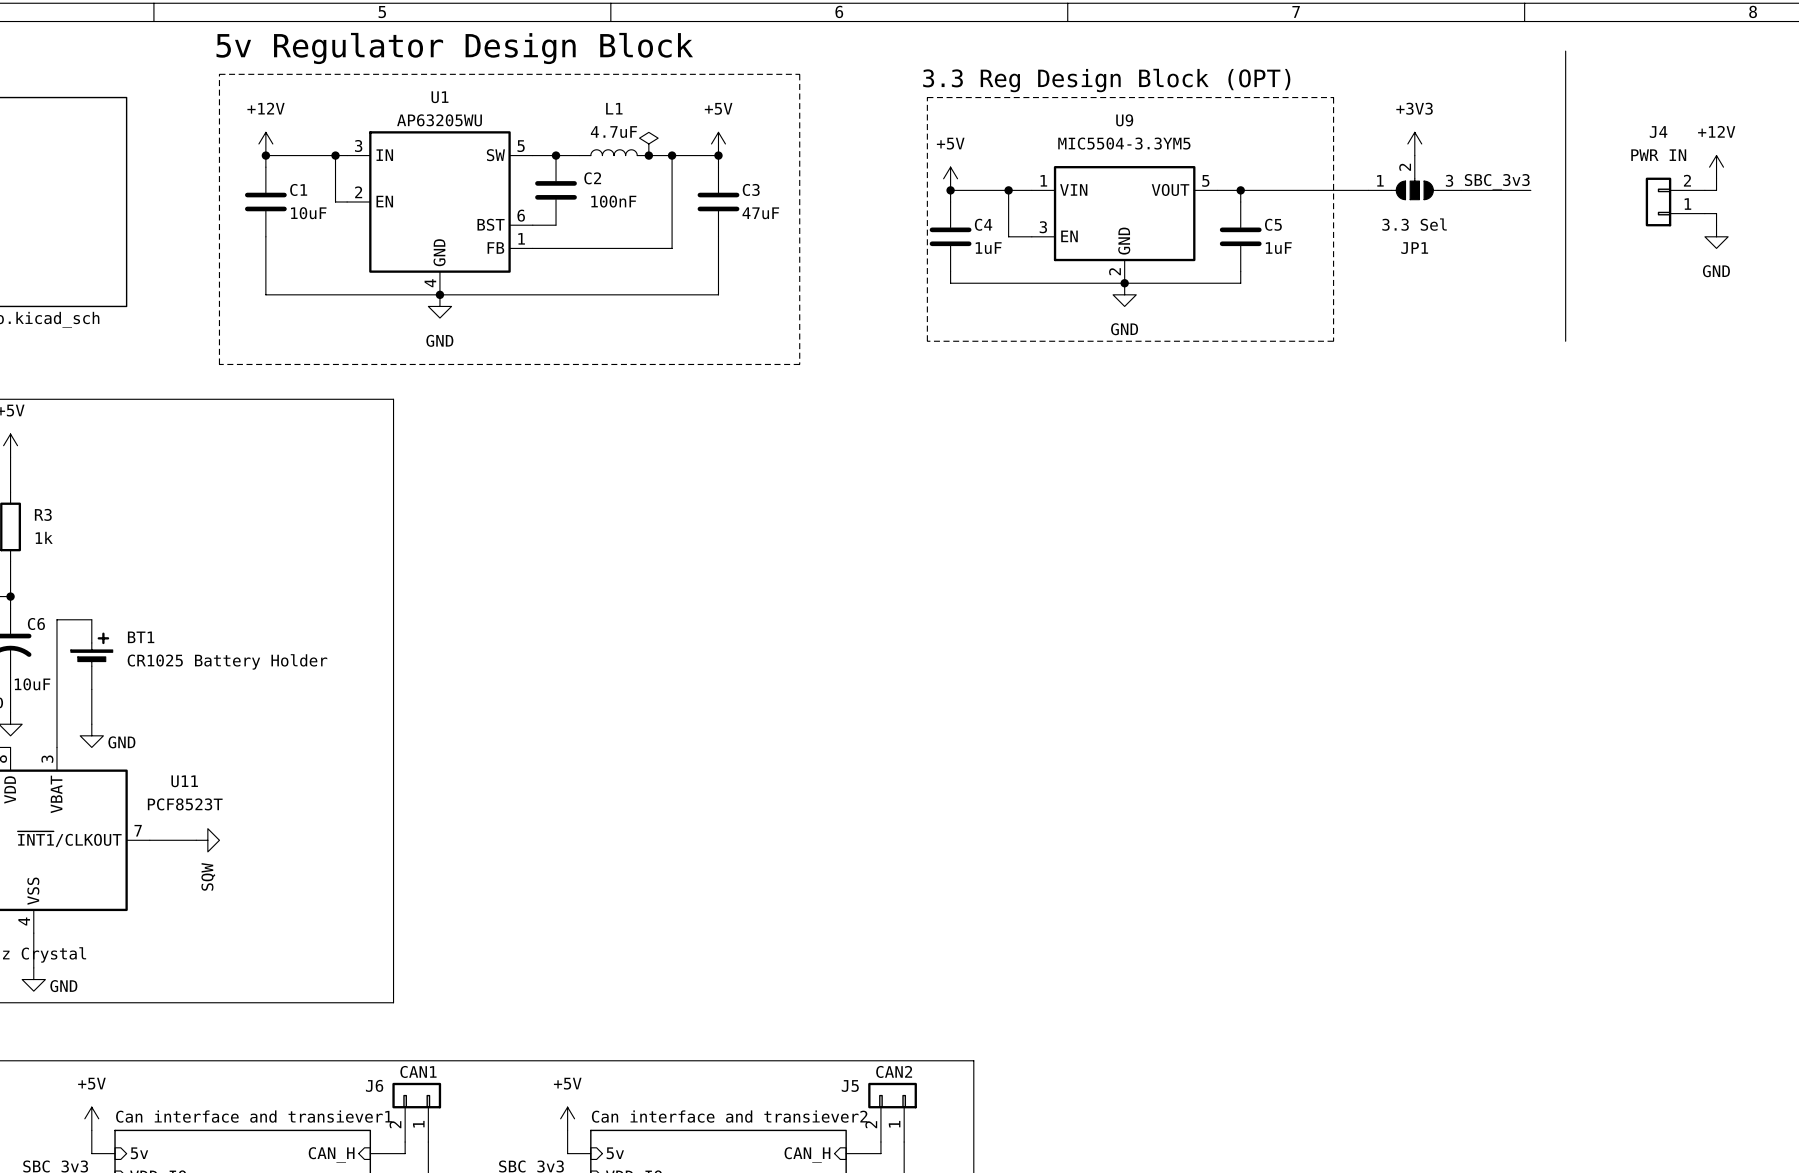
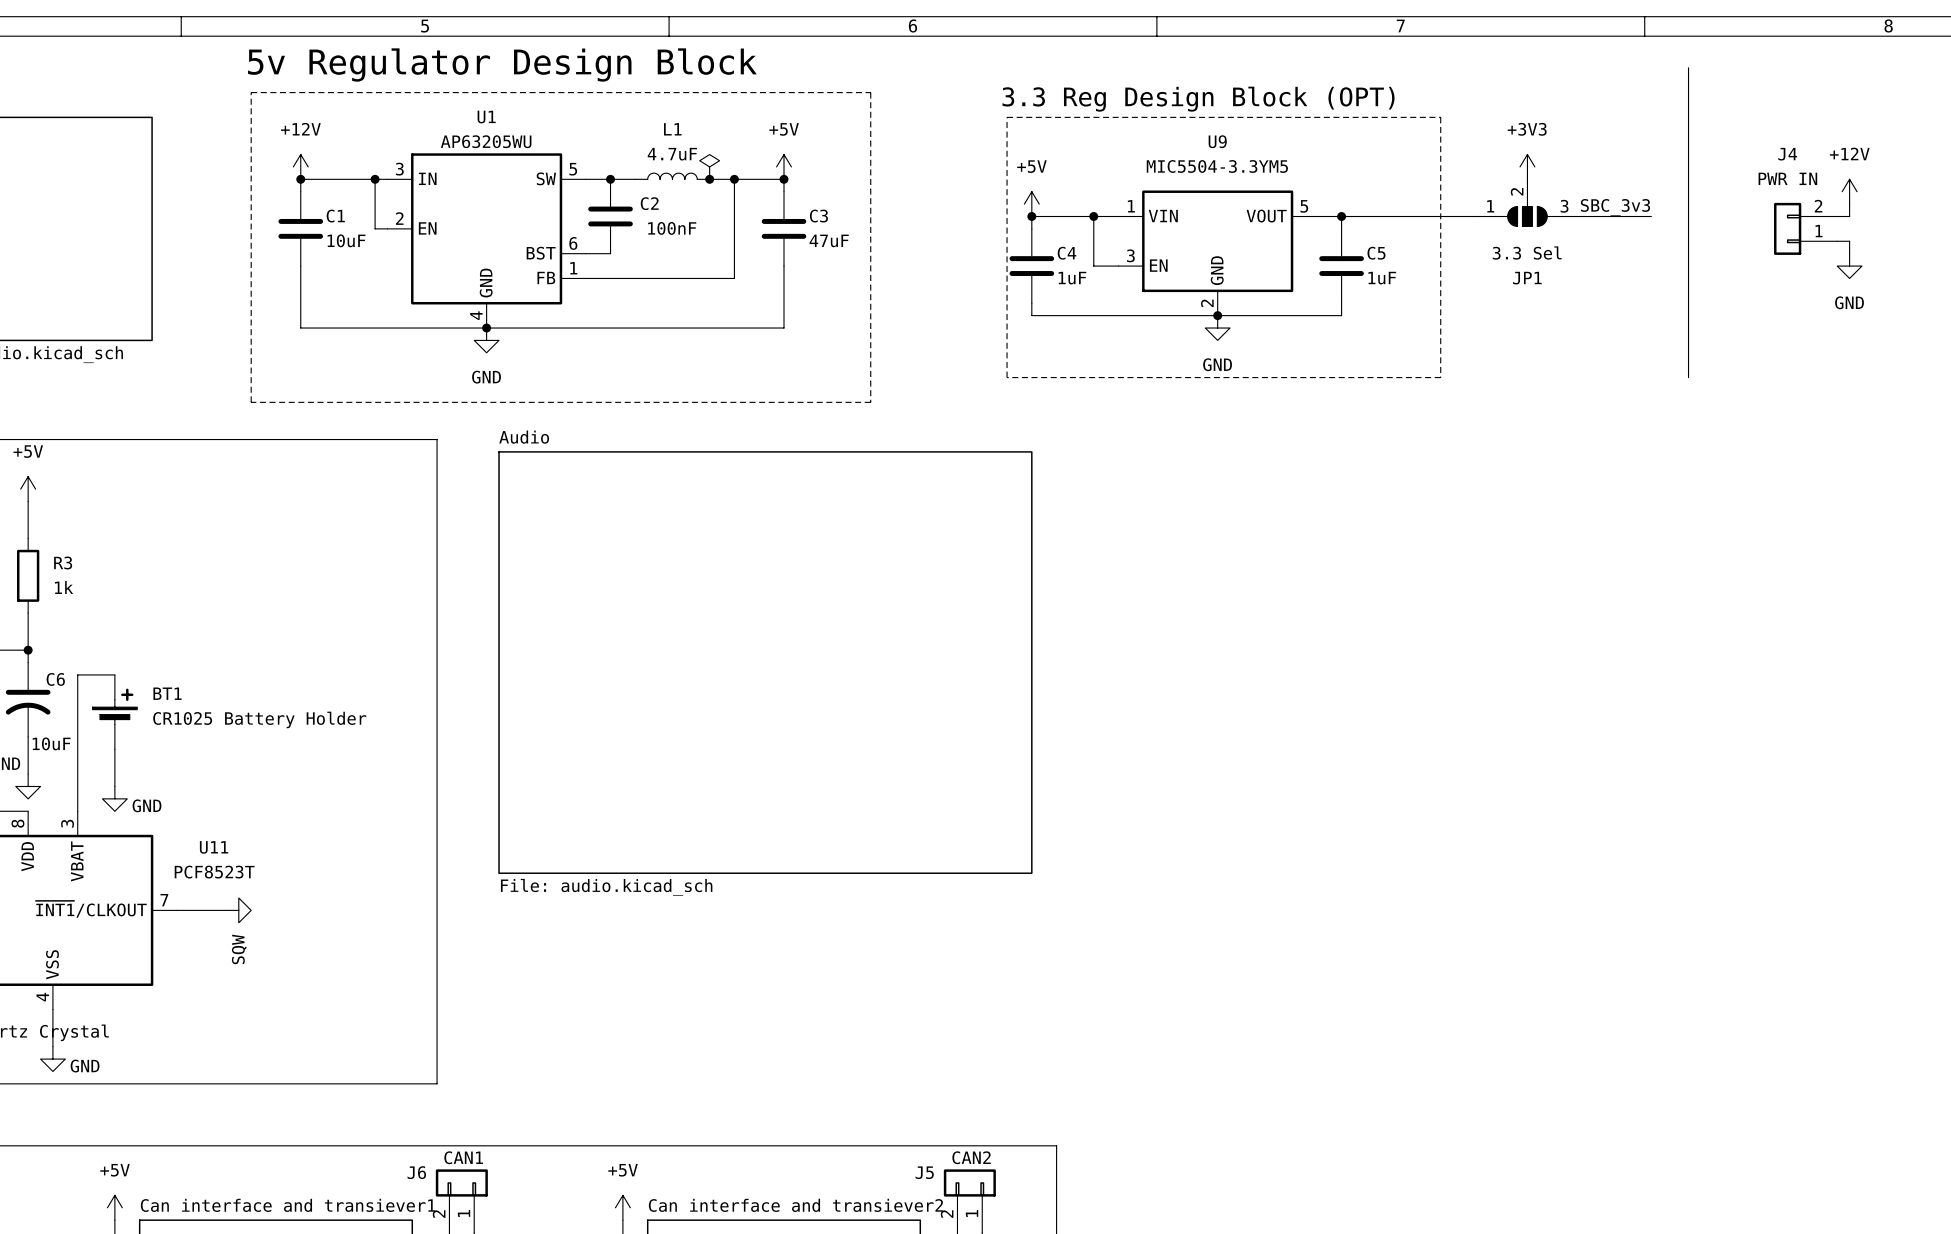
sheet Audio: none -> File: audio.kicad_sch (765, 662)

